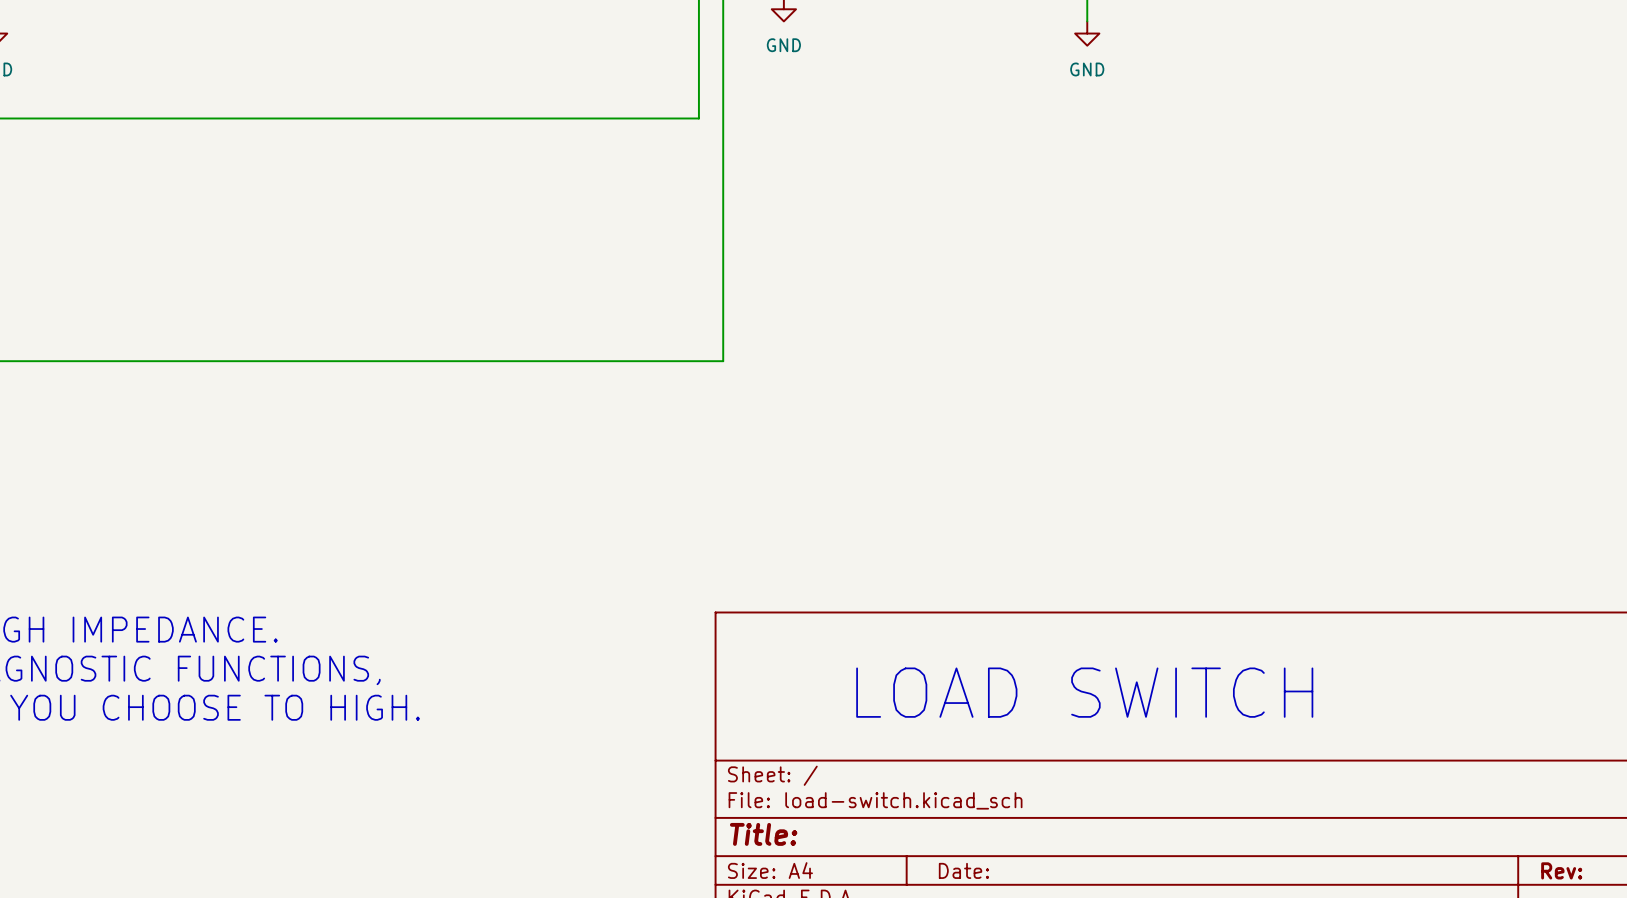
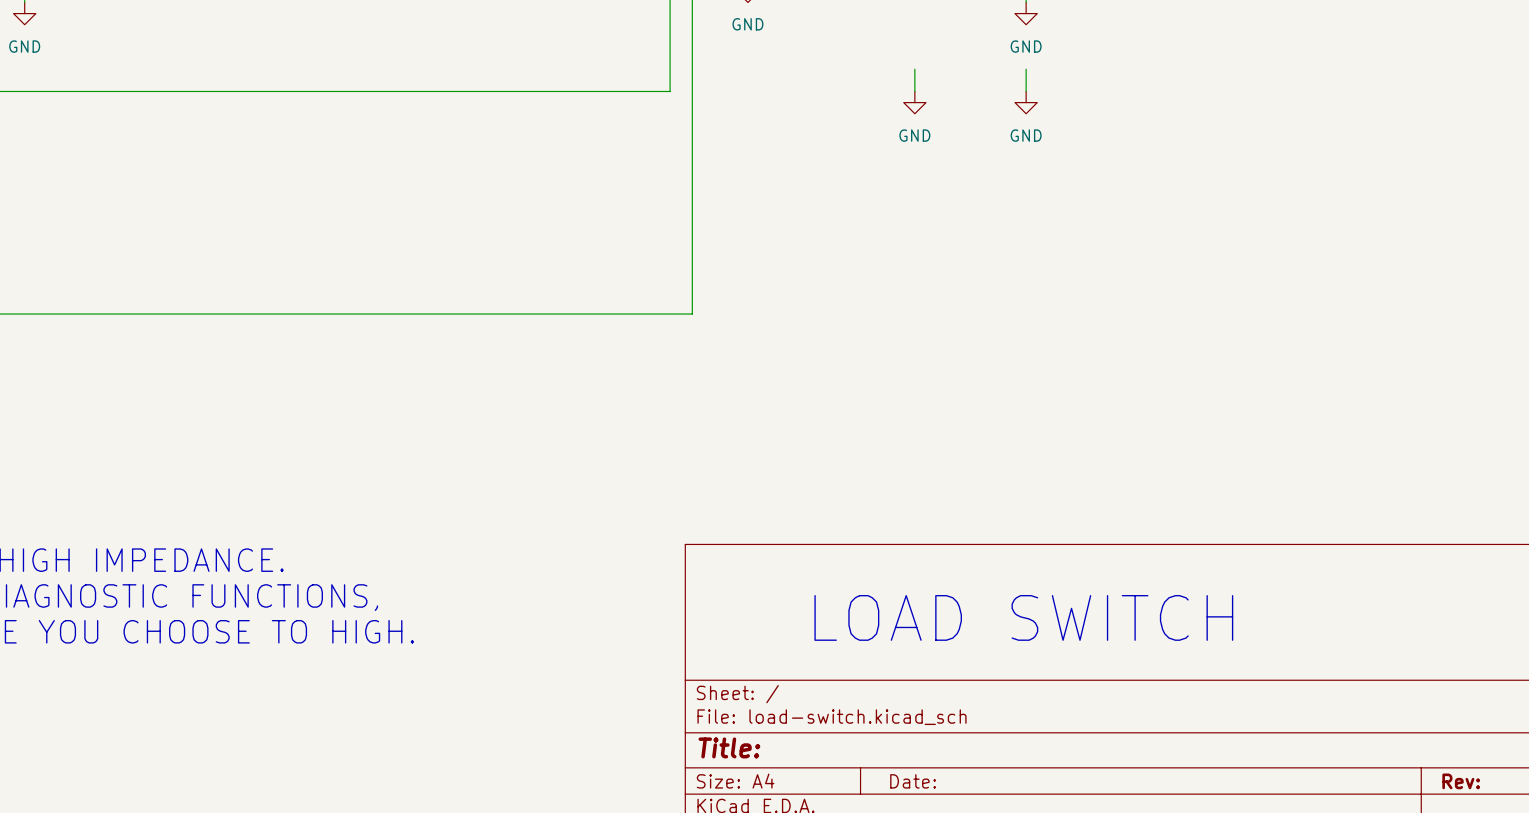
wire: none -> (914, 69) (914, 91)
wire: none -> (1026, 69) (1026, 91)
power symbol: none -> GND (914, 102)
power symbol: none -> GND (1026, 102)

